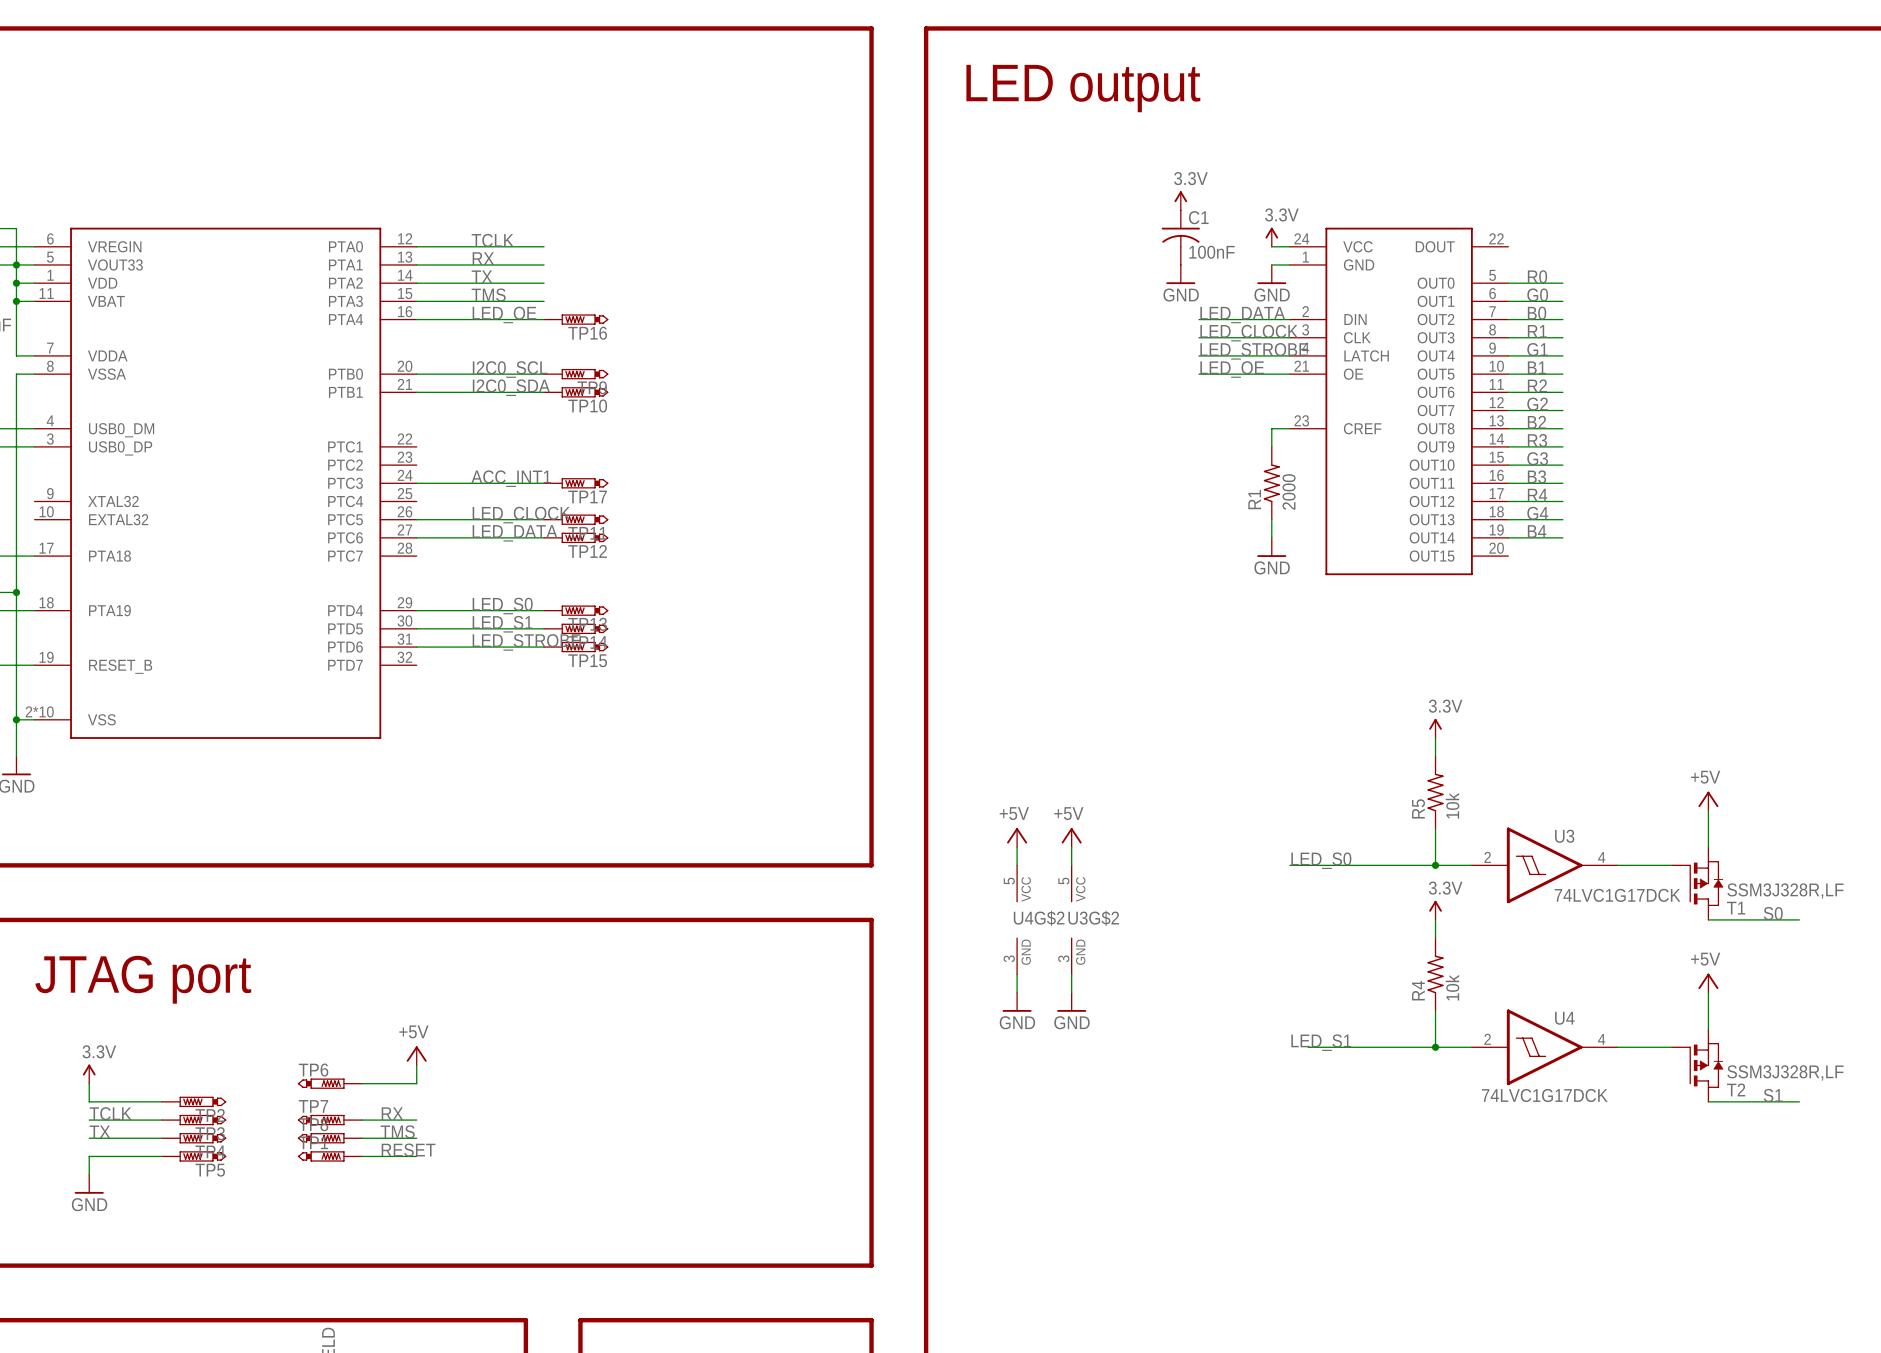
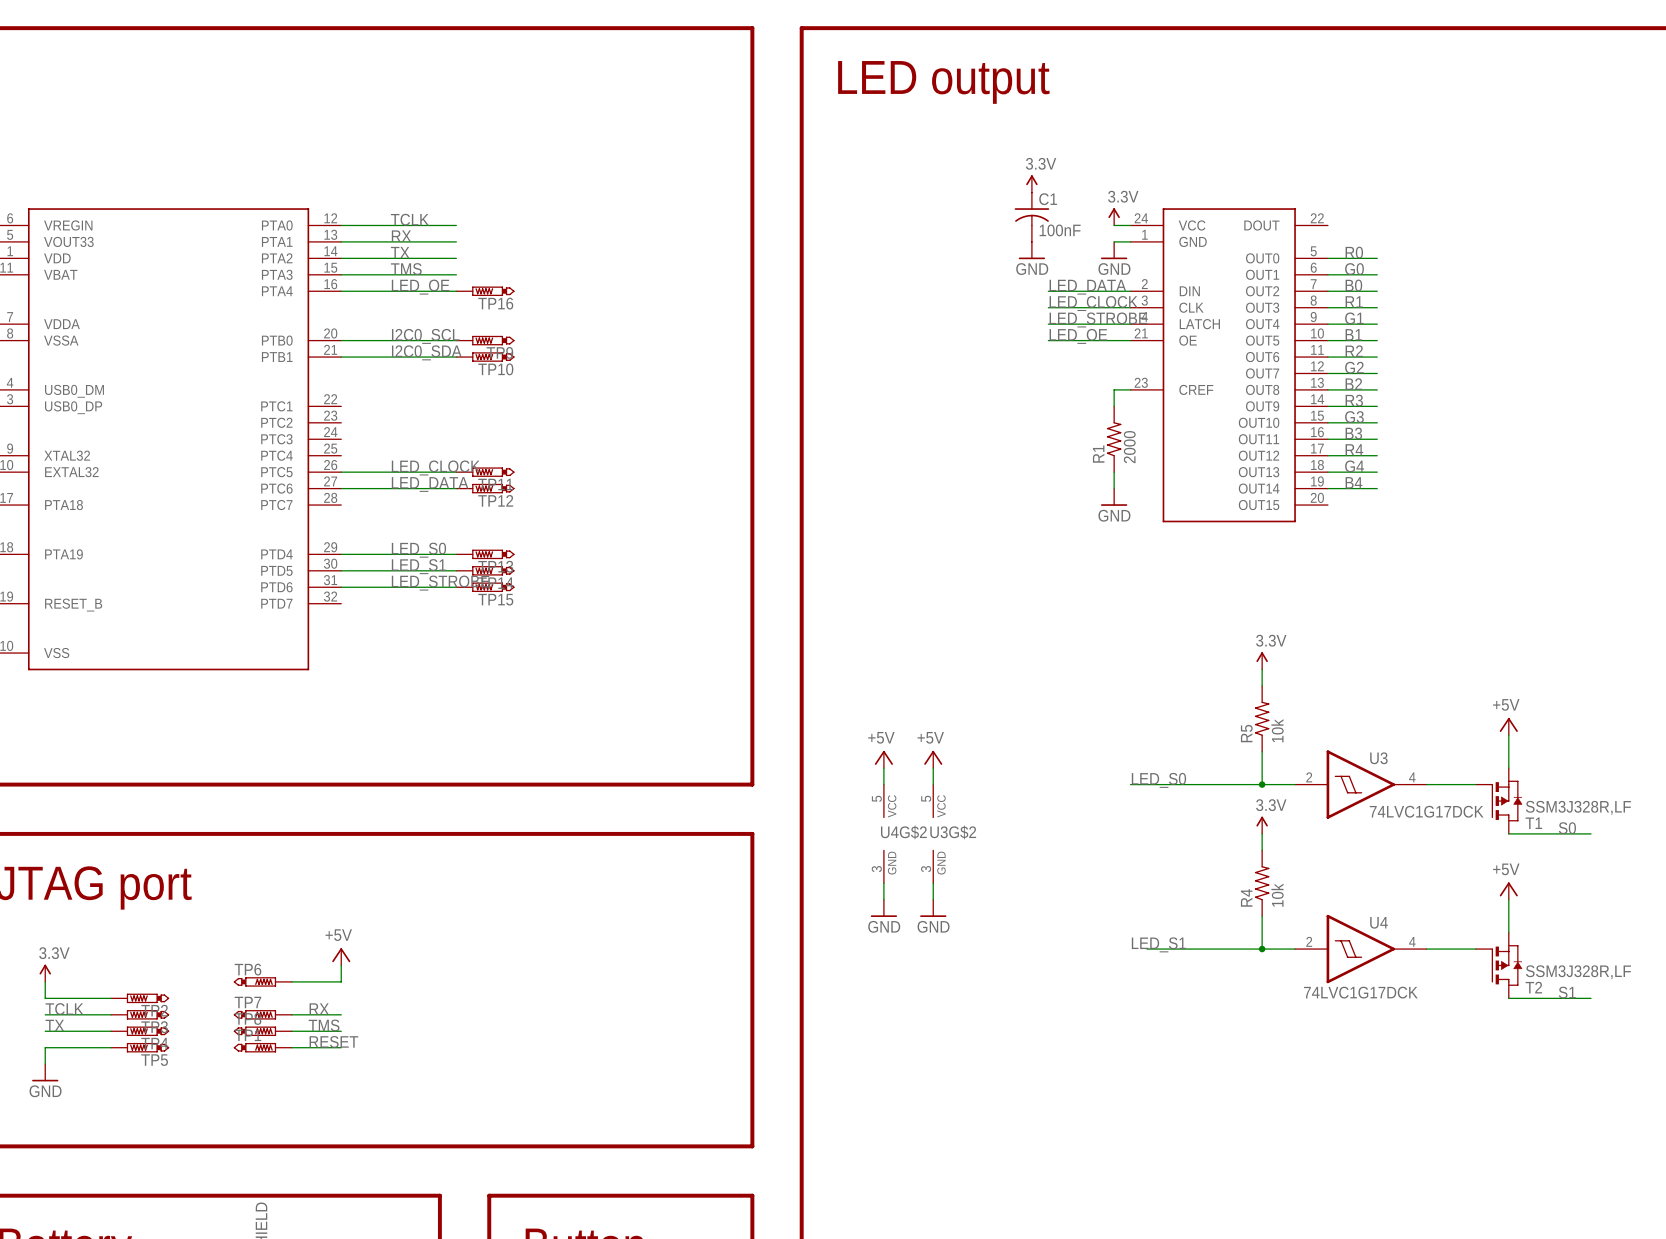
label: ACC_INT1 (511, 478) -> none
wire: (416, 483) (544, 483) -> none
TP17: (576, 483) -> none

